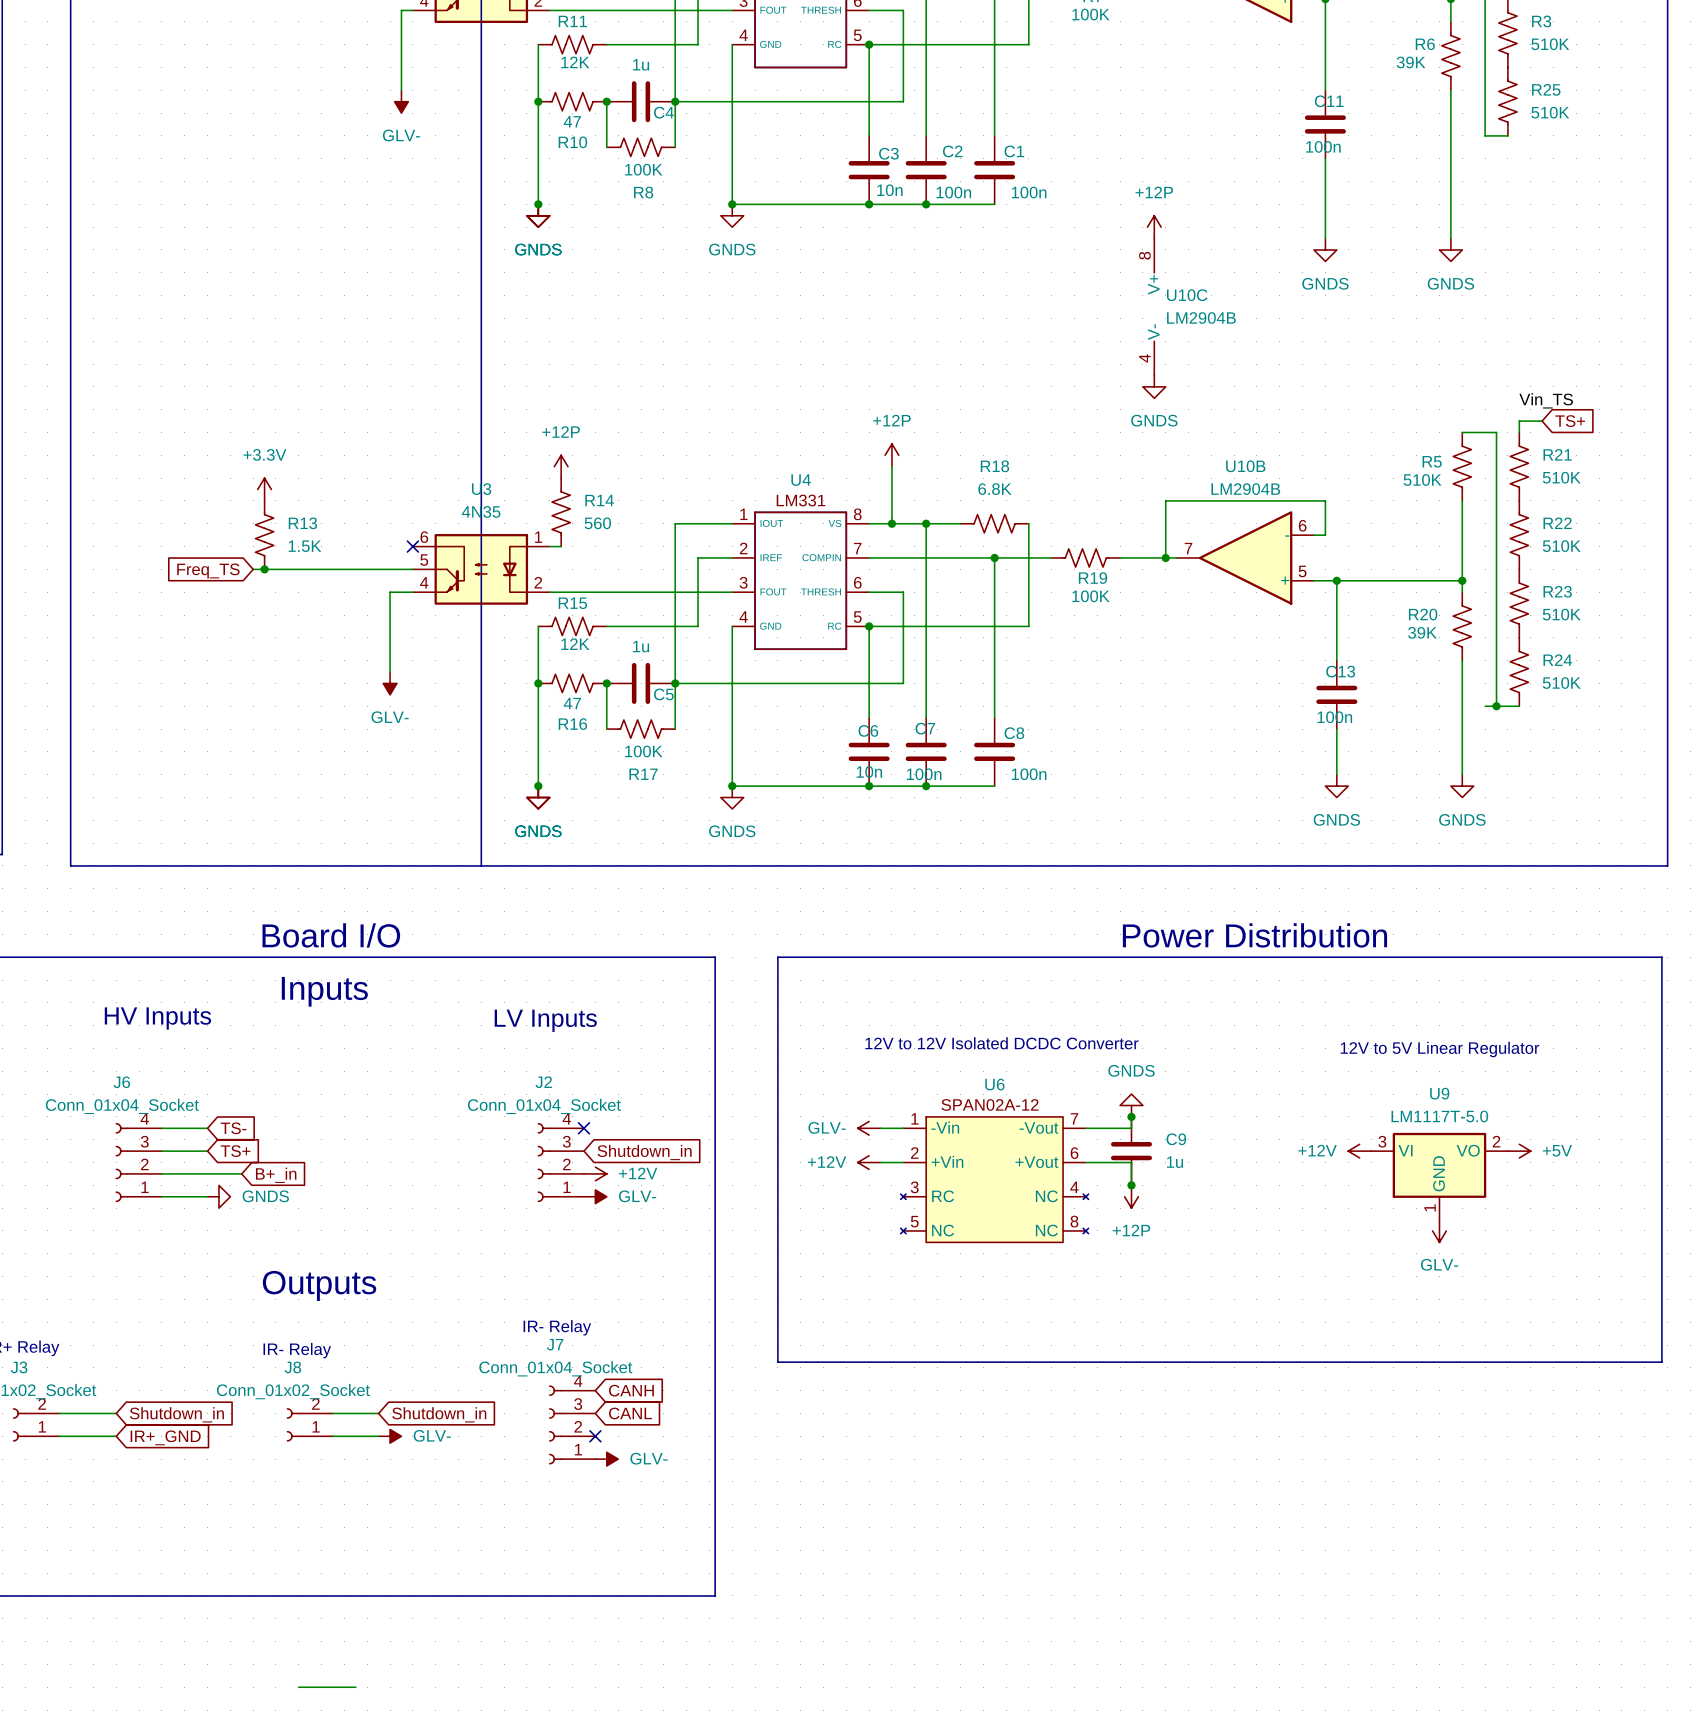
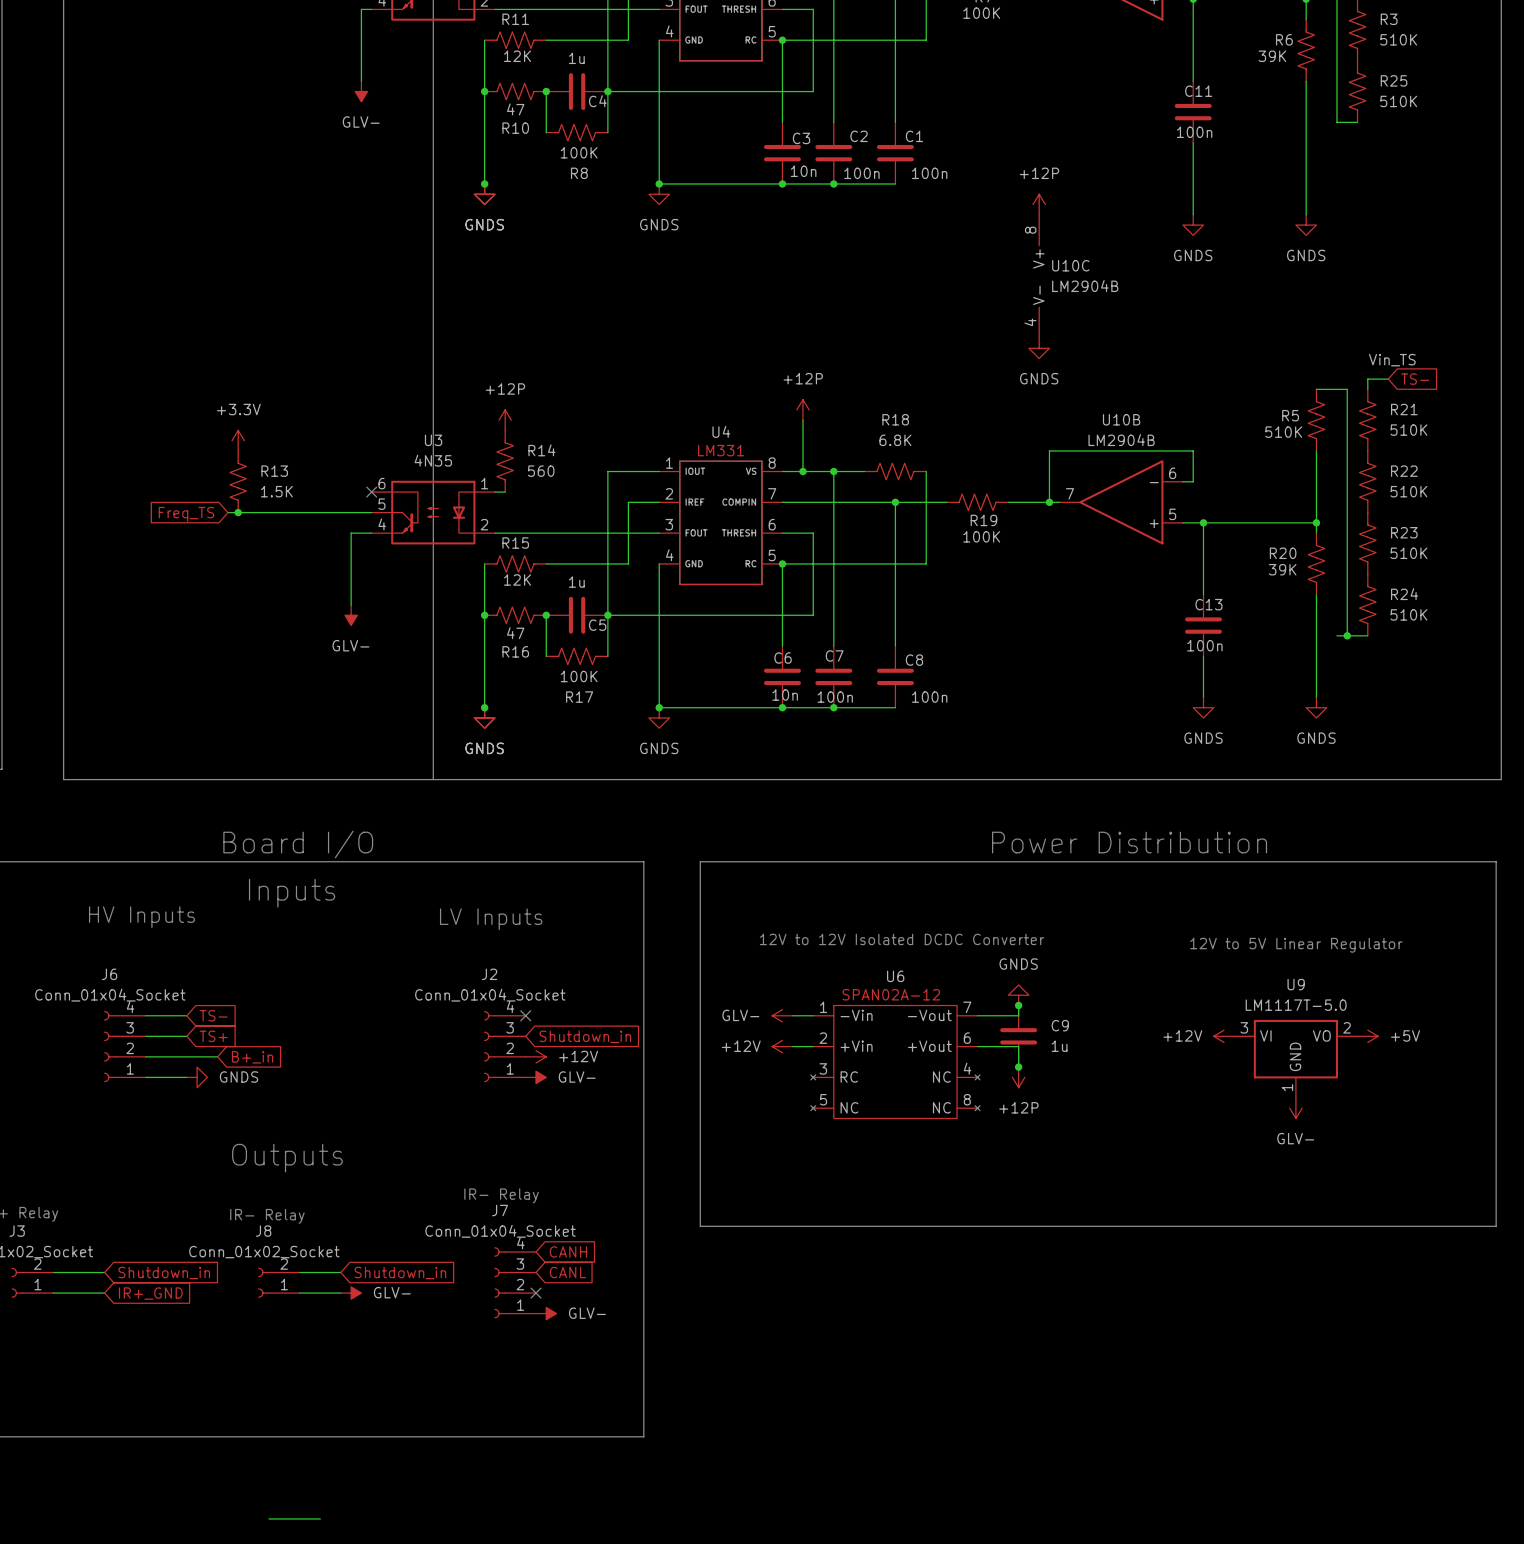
global label: TS+ (1570, 421) -> TS- (1415, 379)

